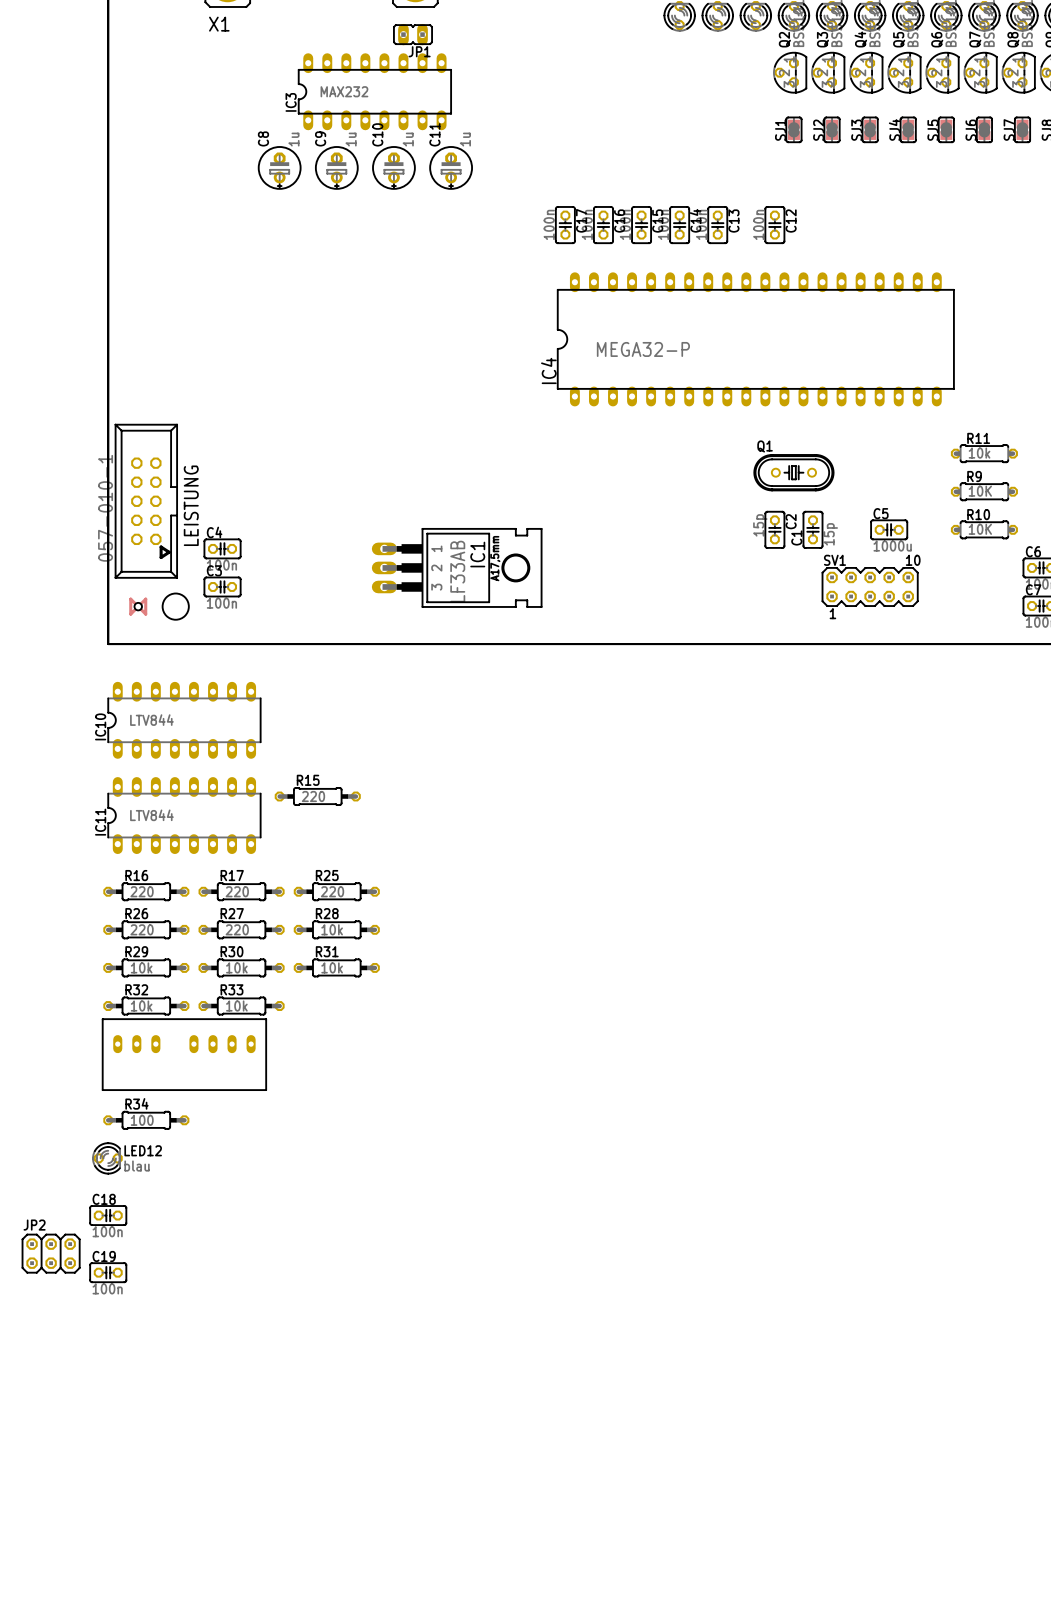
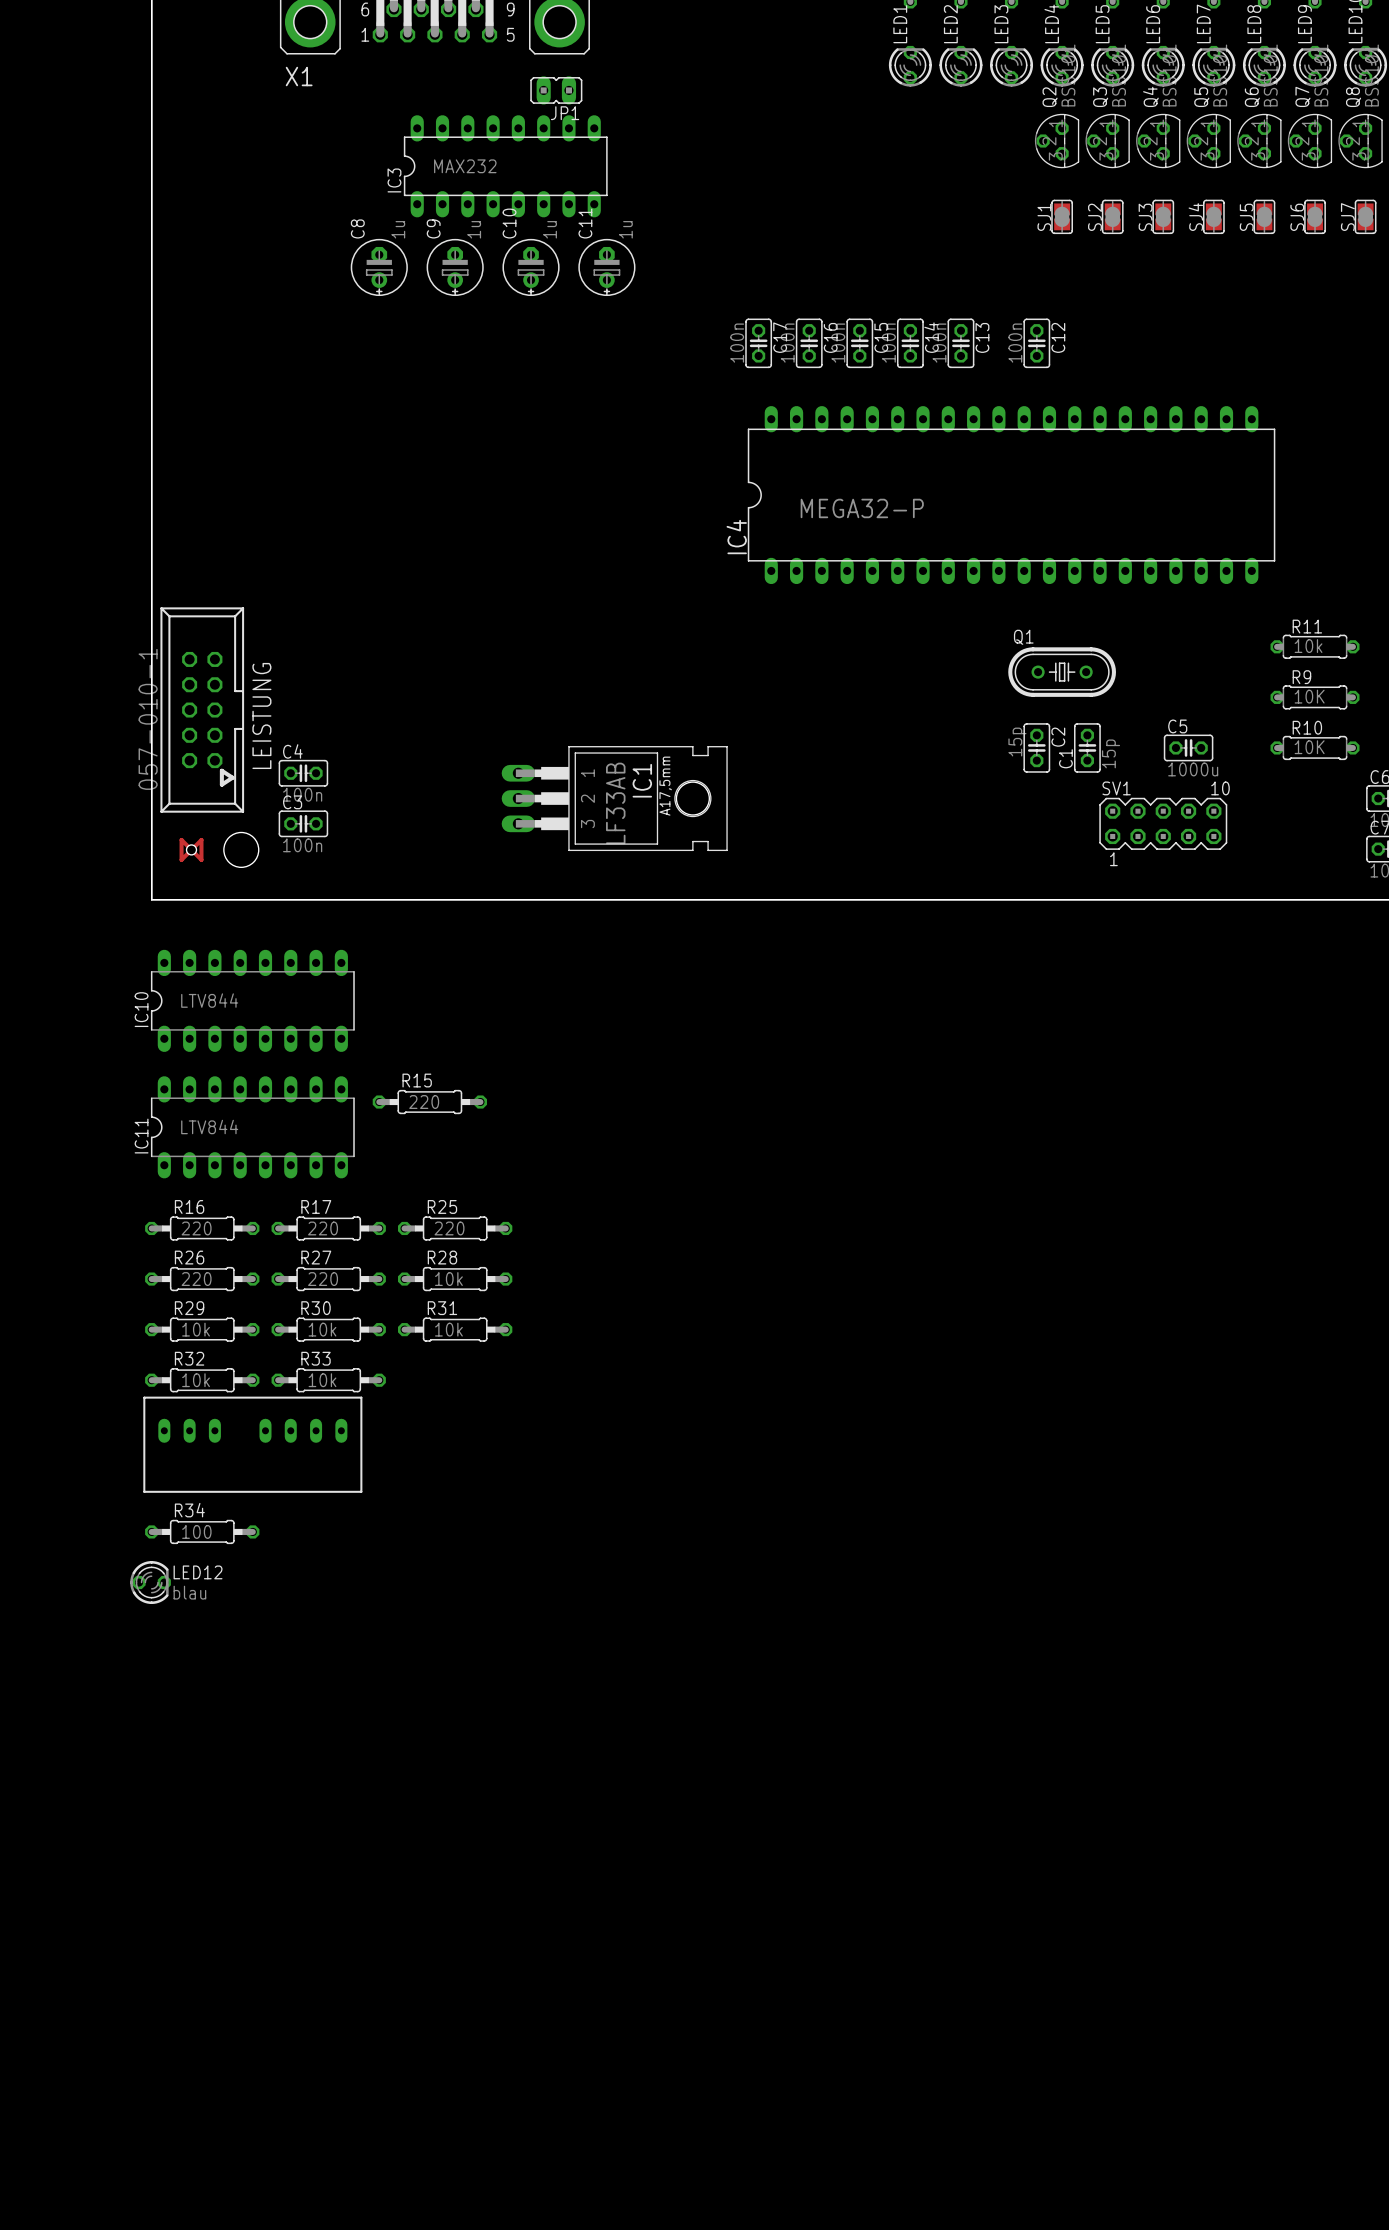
C18: 100n (108, 1215) -> none
JP2: (51, 1253) -> none
C19: 100n (108, 1272) -> none

